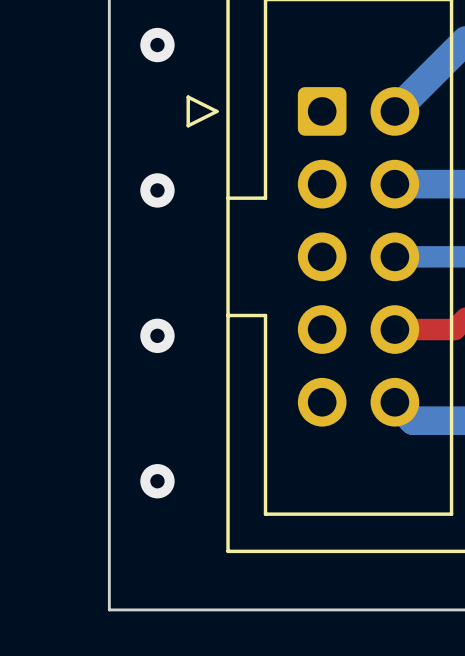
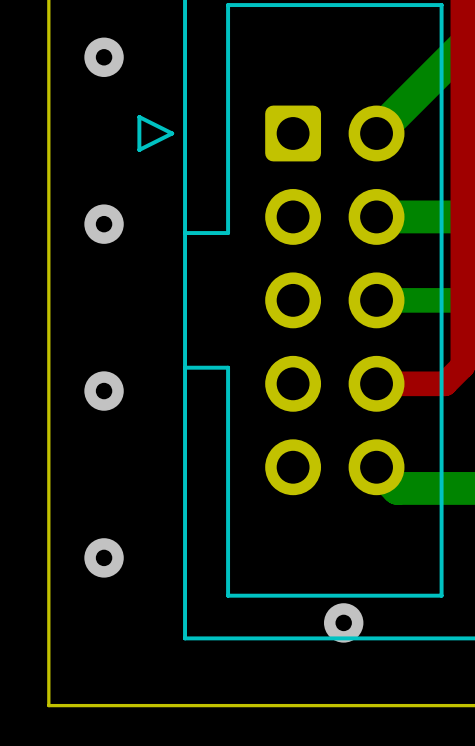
via: none -> (343, 622)

